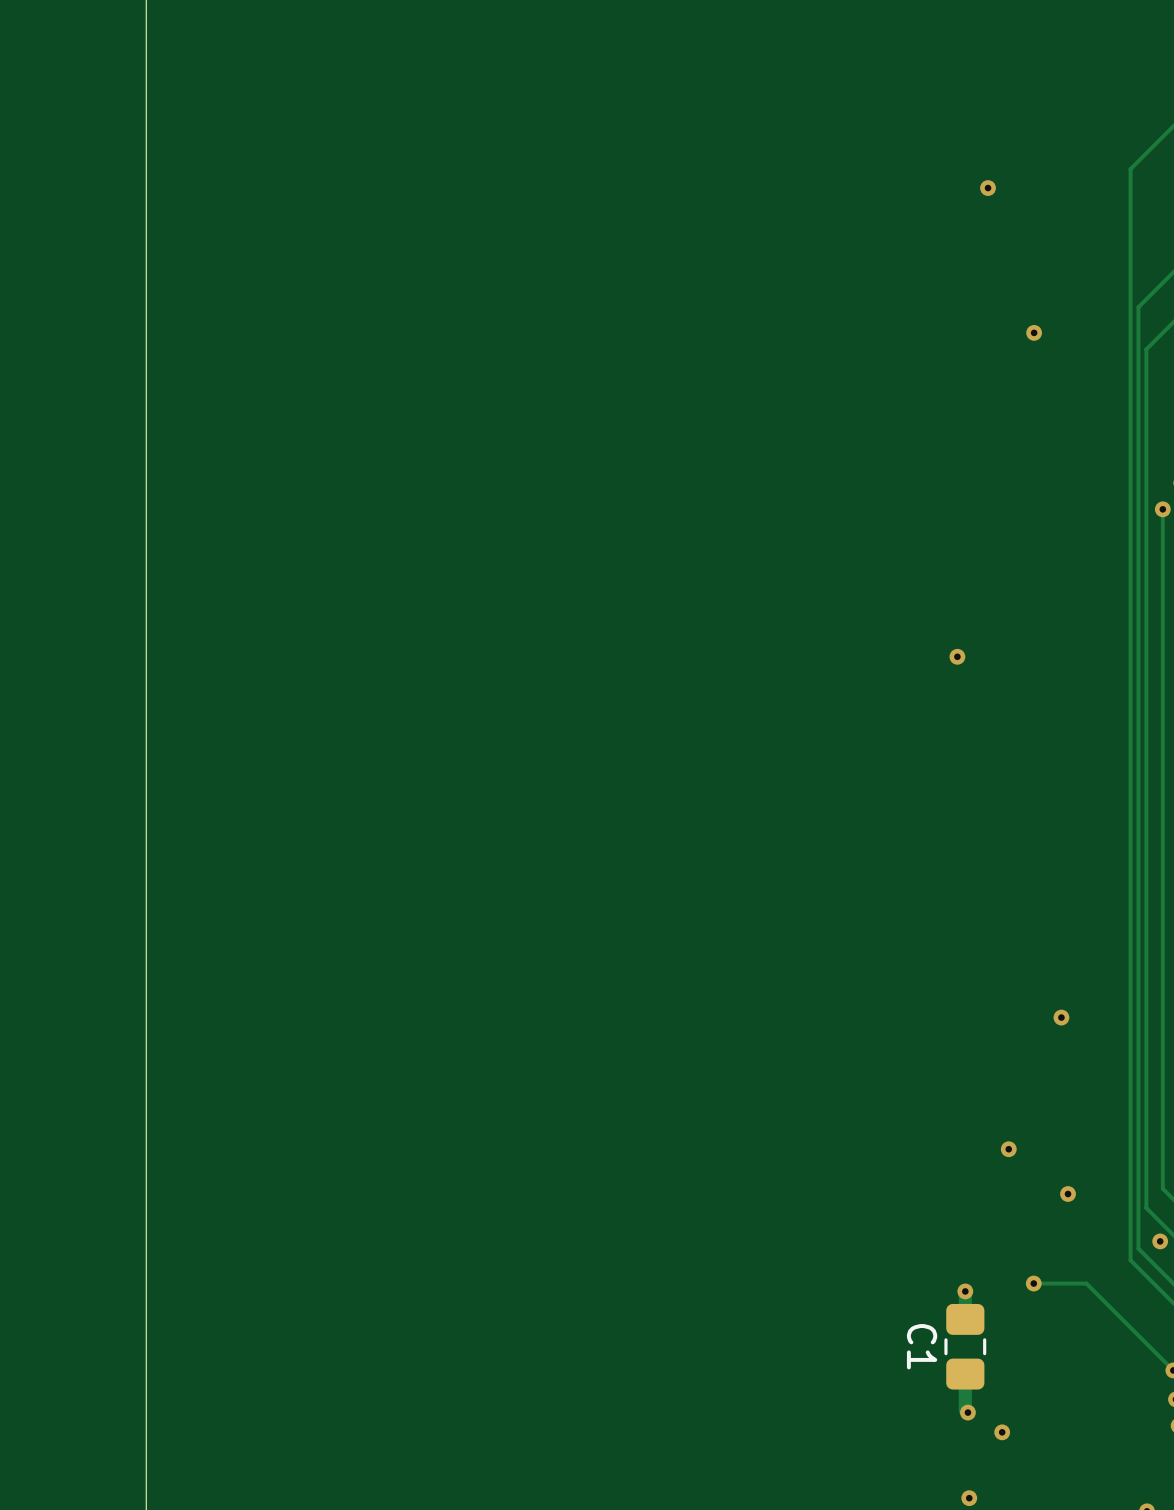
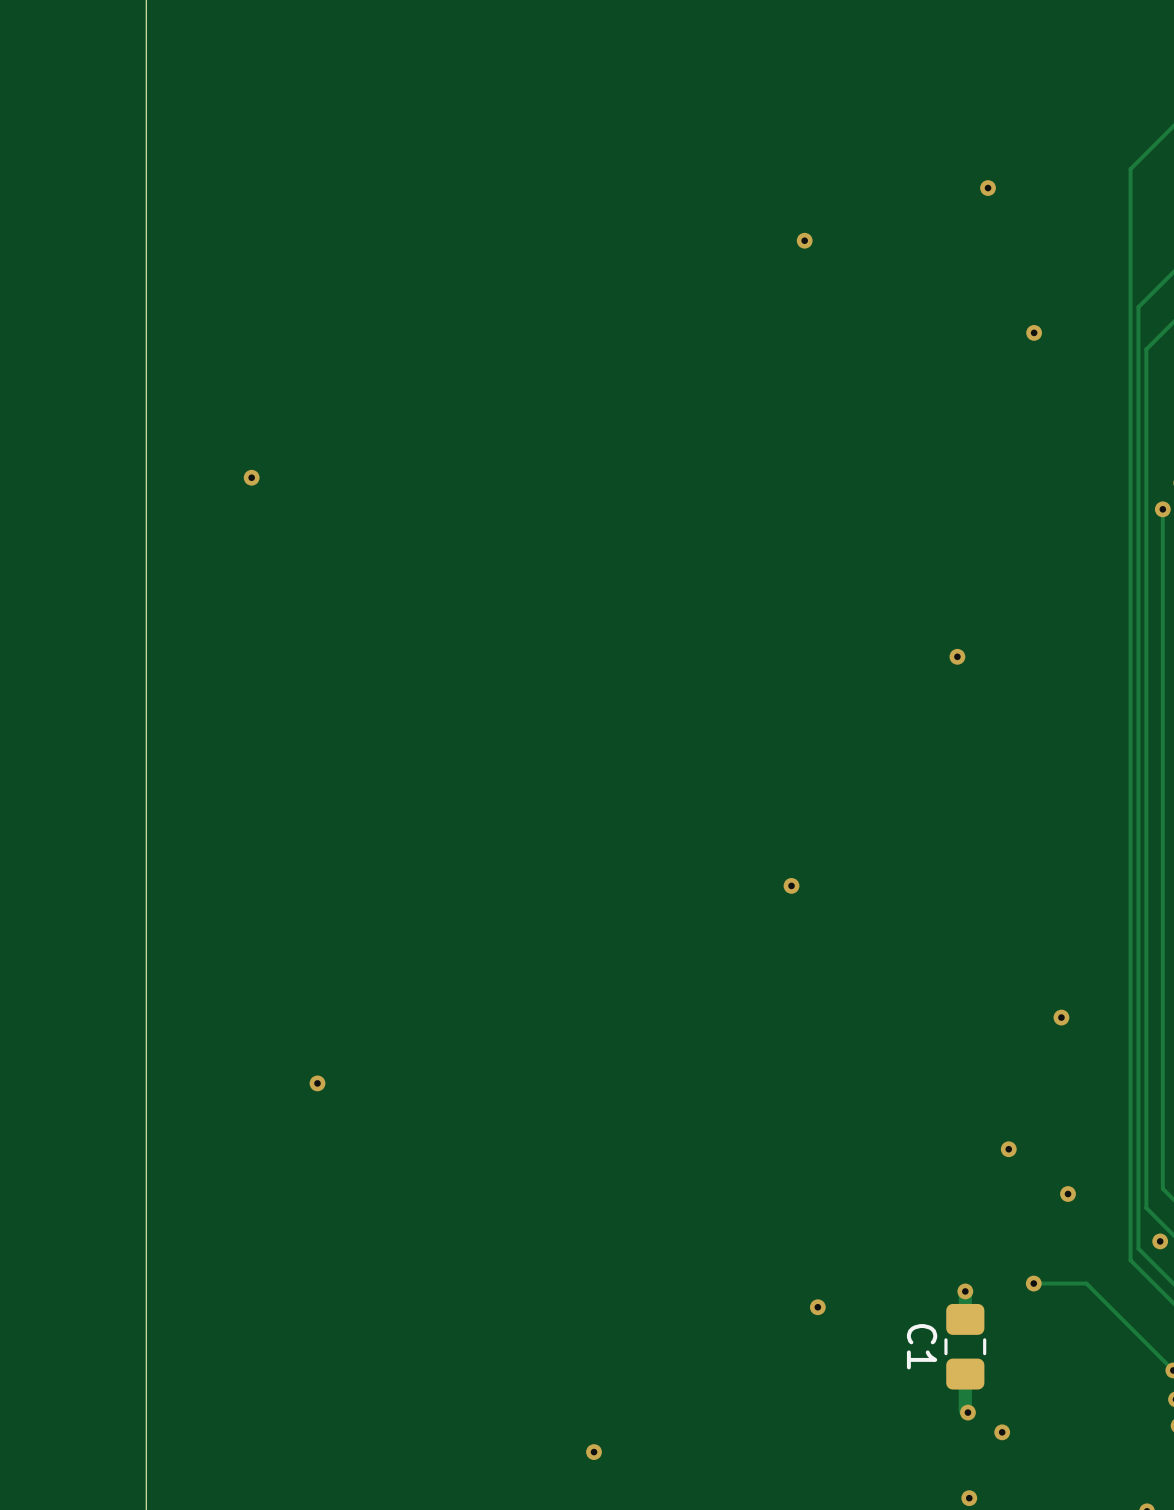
via: none -> (804, 240)
via: none -> (251, 477)
via: none -> (791, 885)
via: none -> (317, 1083)
via: none -> (817, 1307)
via: none -> (594, 1452)

